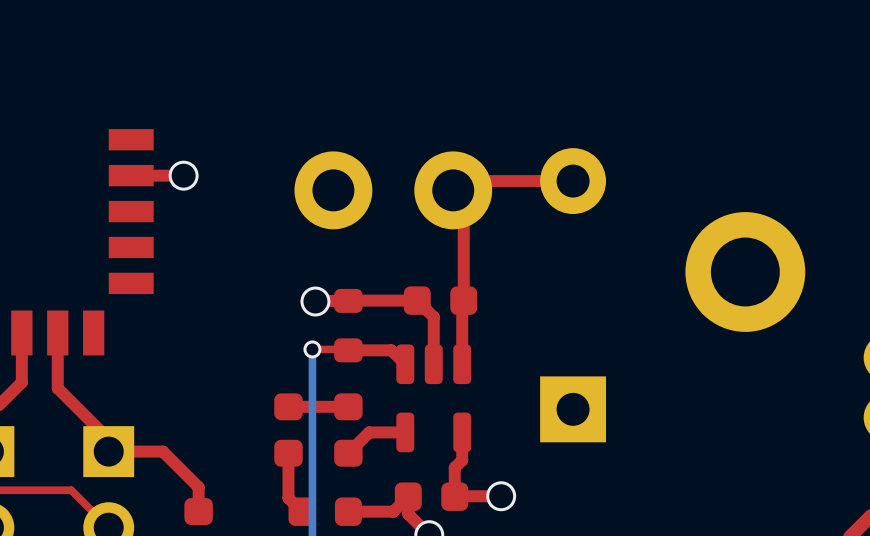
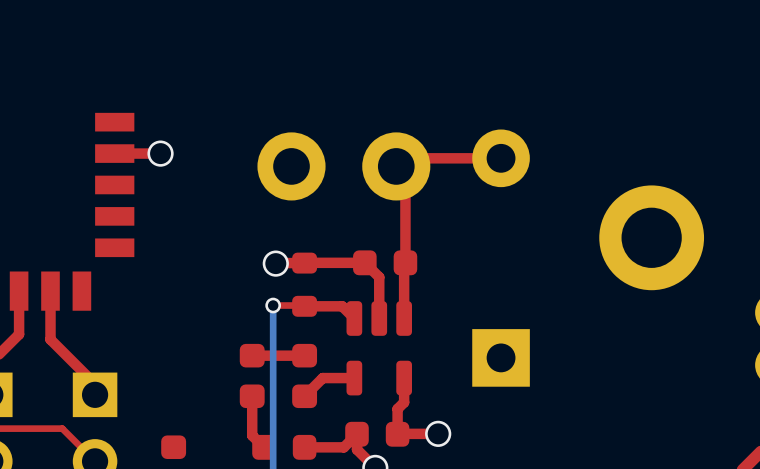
top track: (108, 451) (162, 451) (198, 487) (198, 511) -> none

